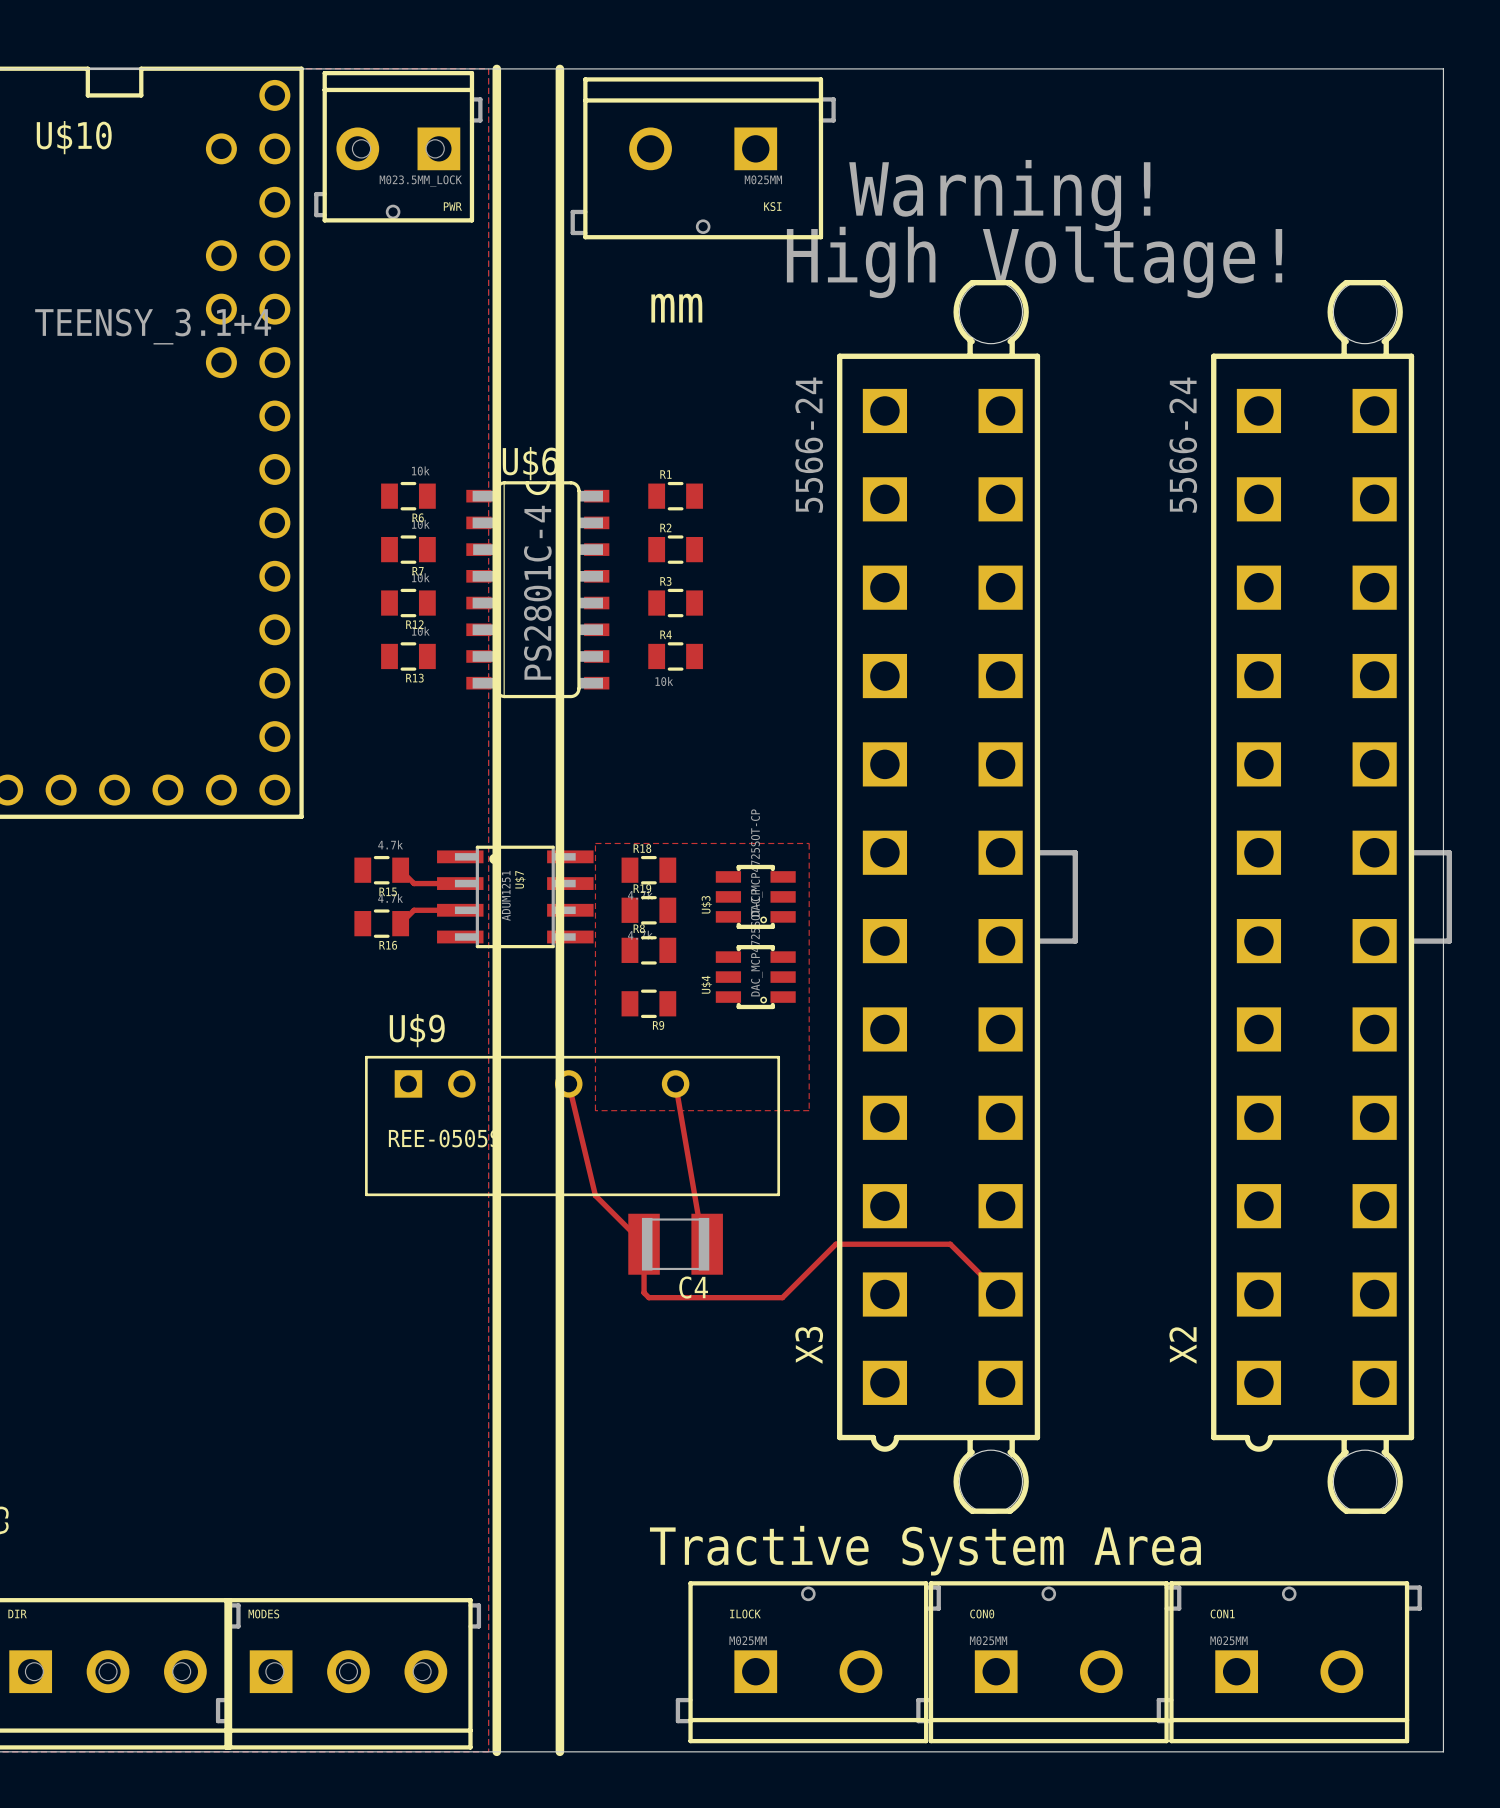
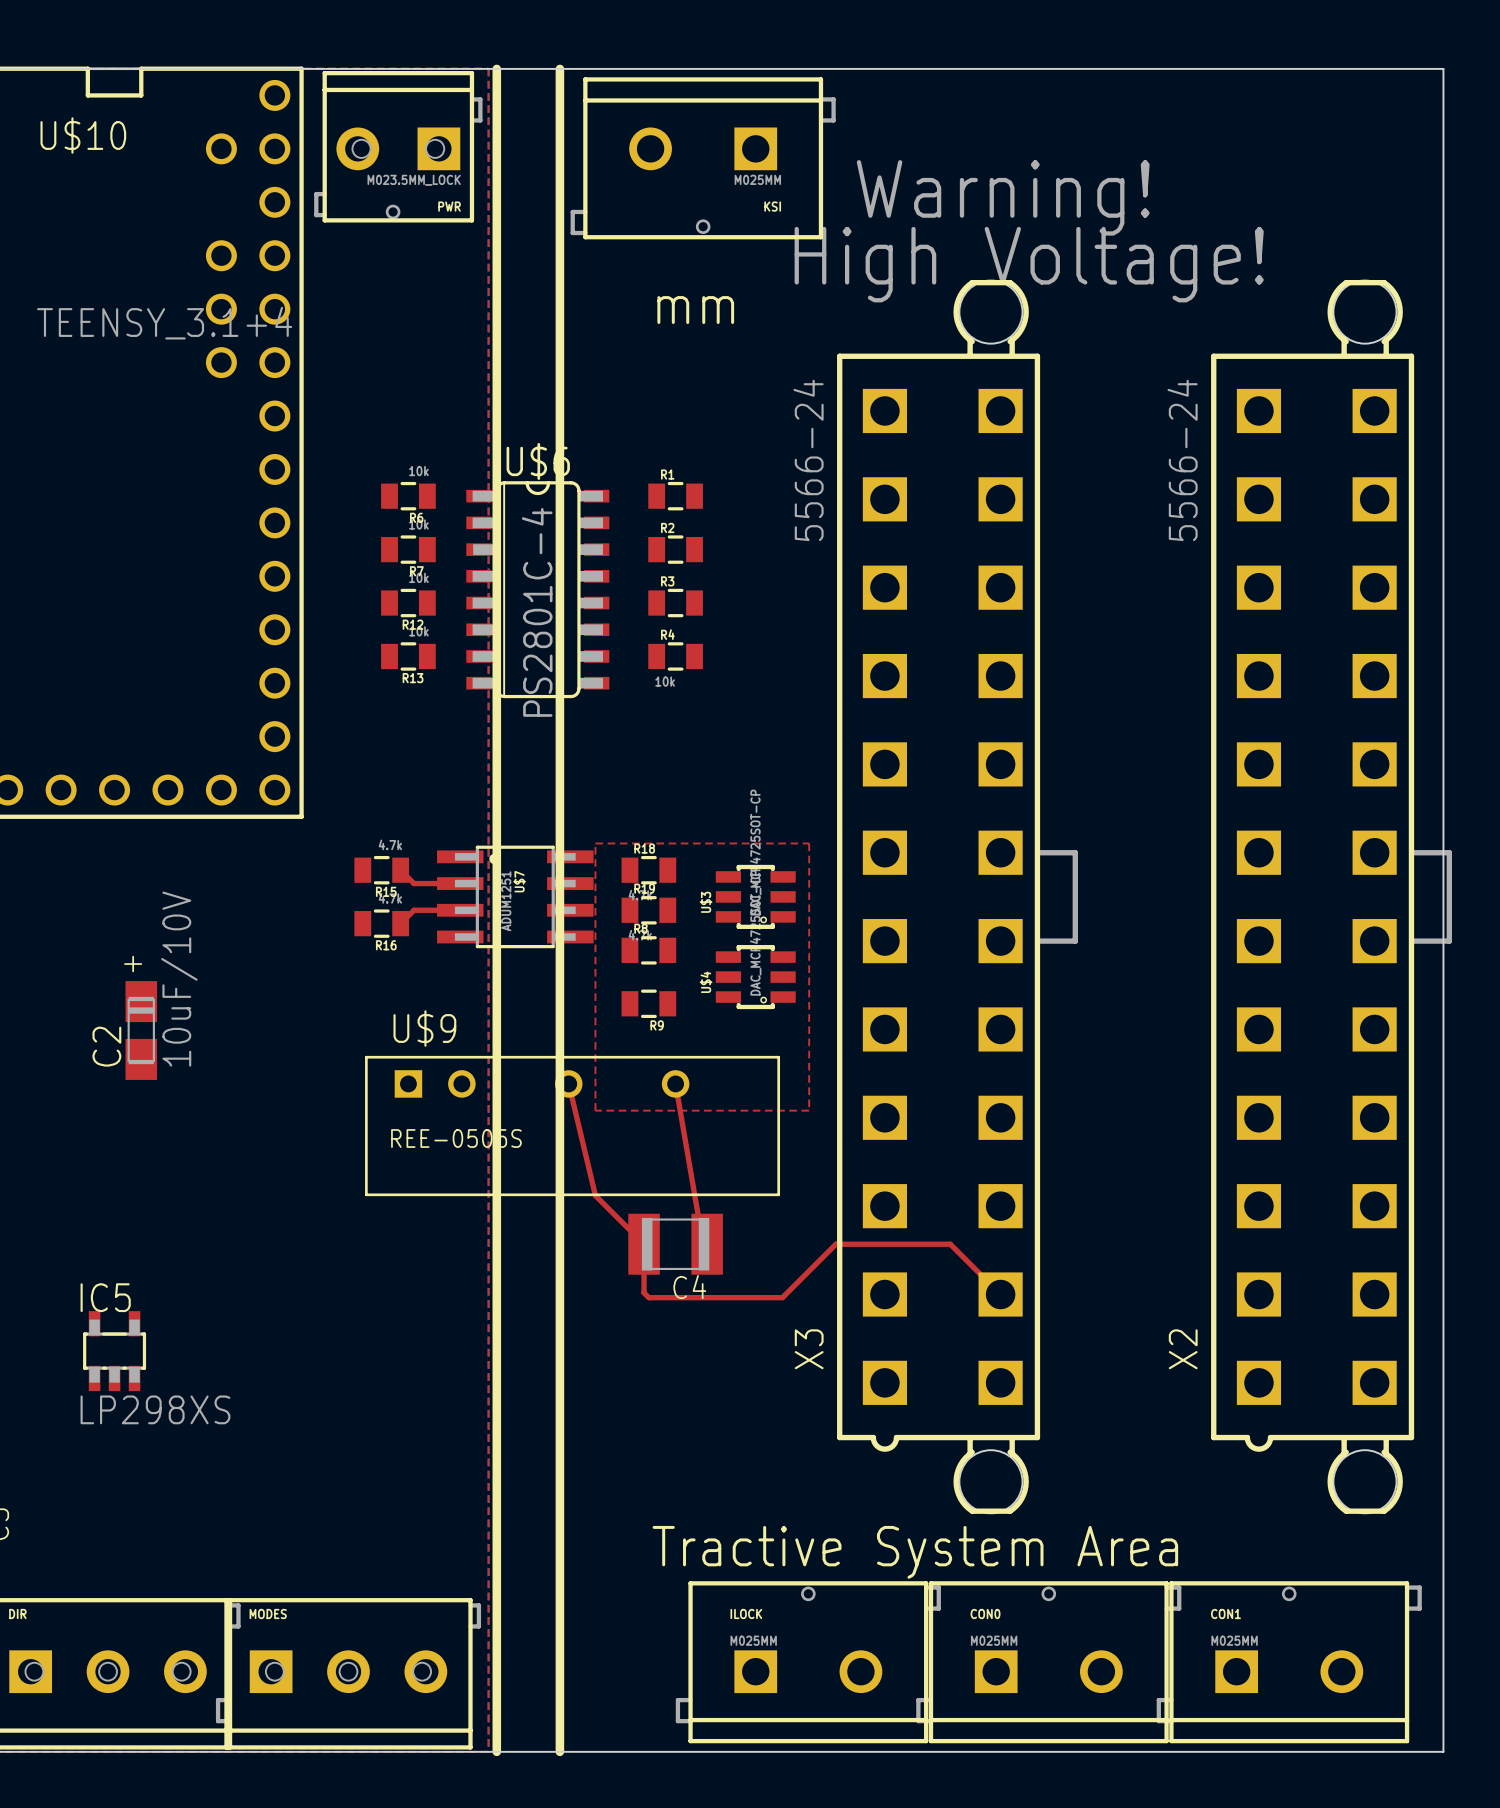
C2: none -> 10uF/10V (141, 1030)
IC5: none -> LP298XS (114, 1351)

